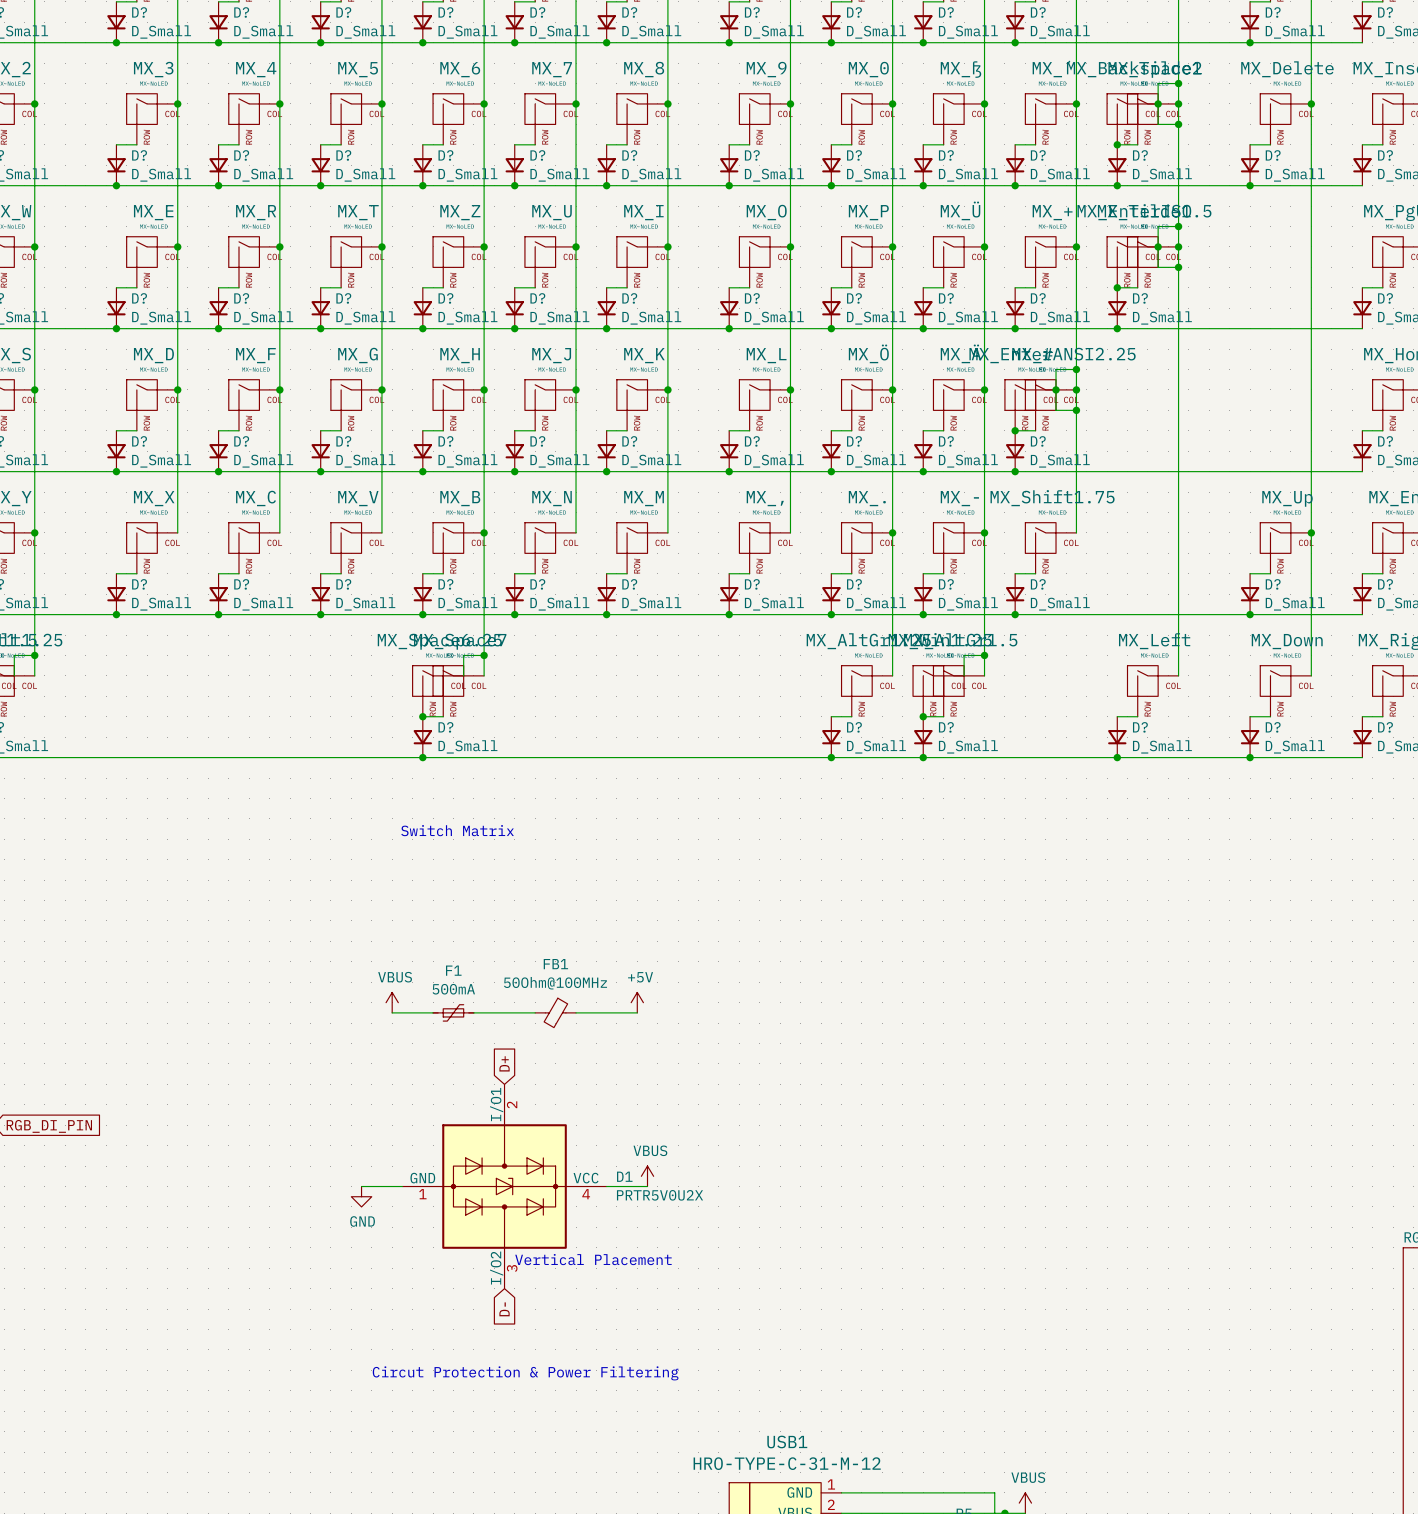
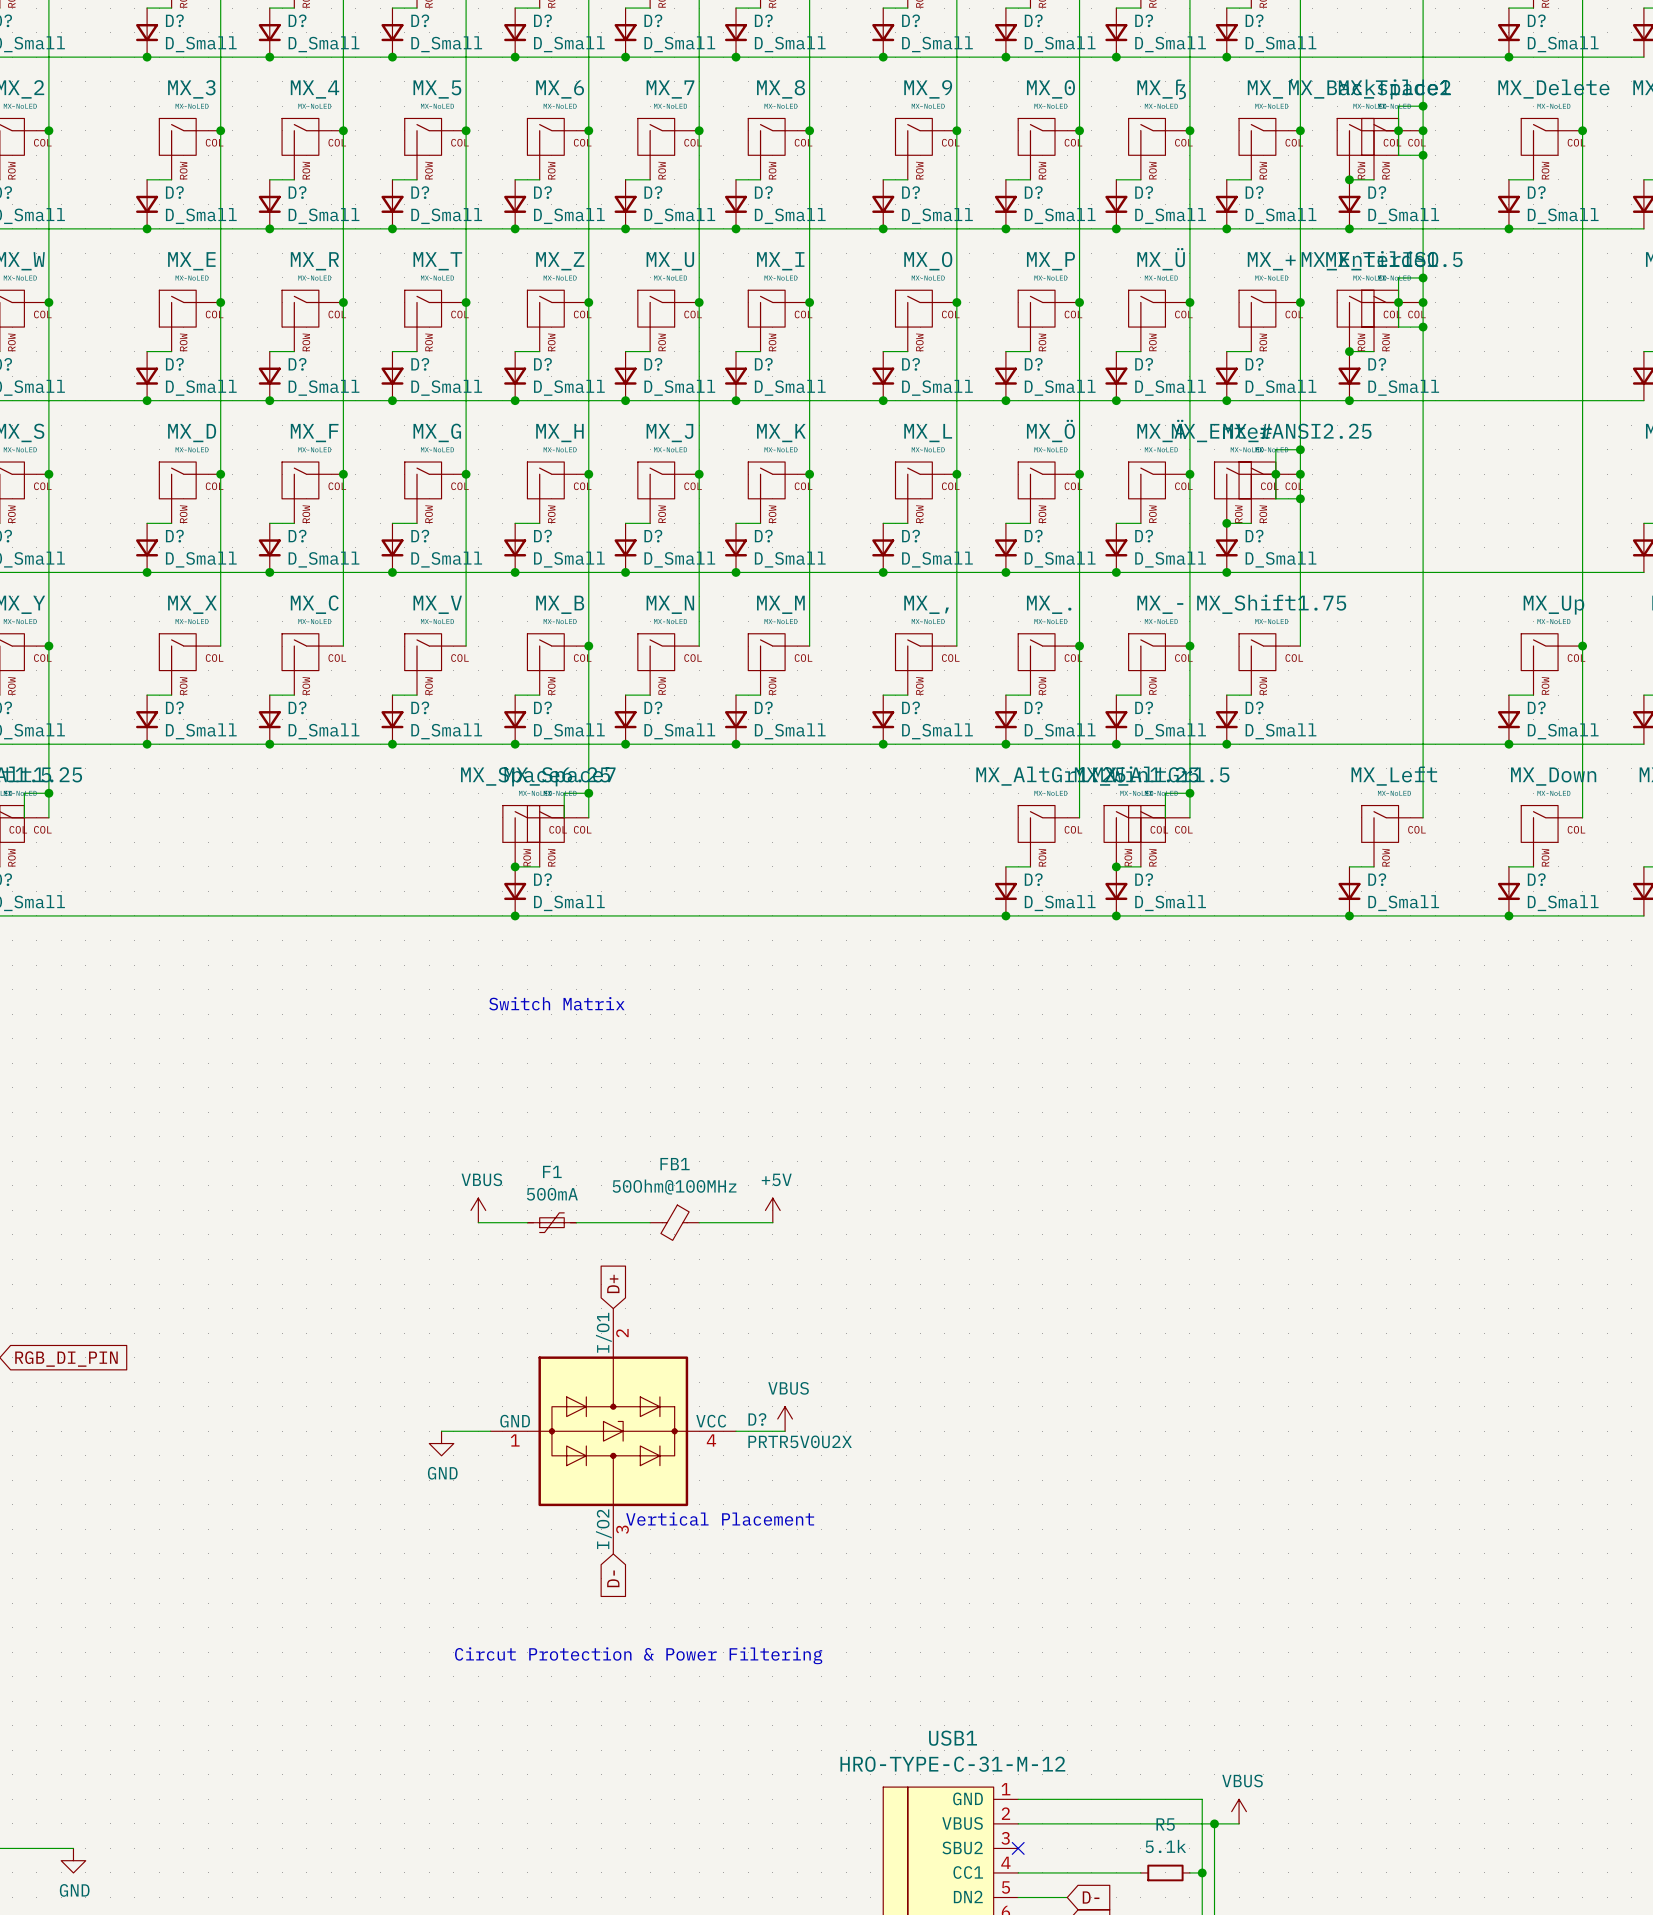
D1 name: D1 (624, 1176) -> D? (757, 1419)

